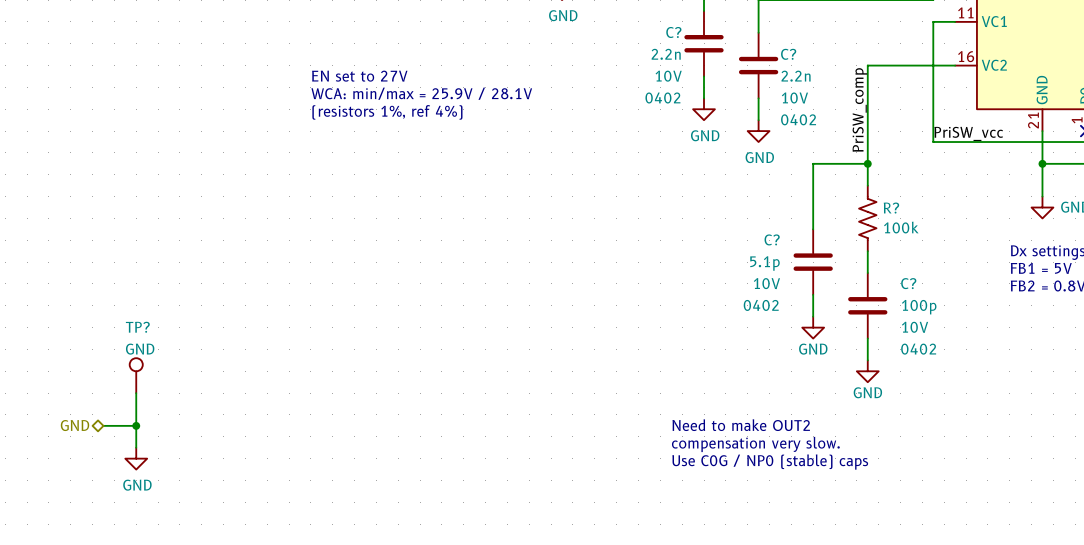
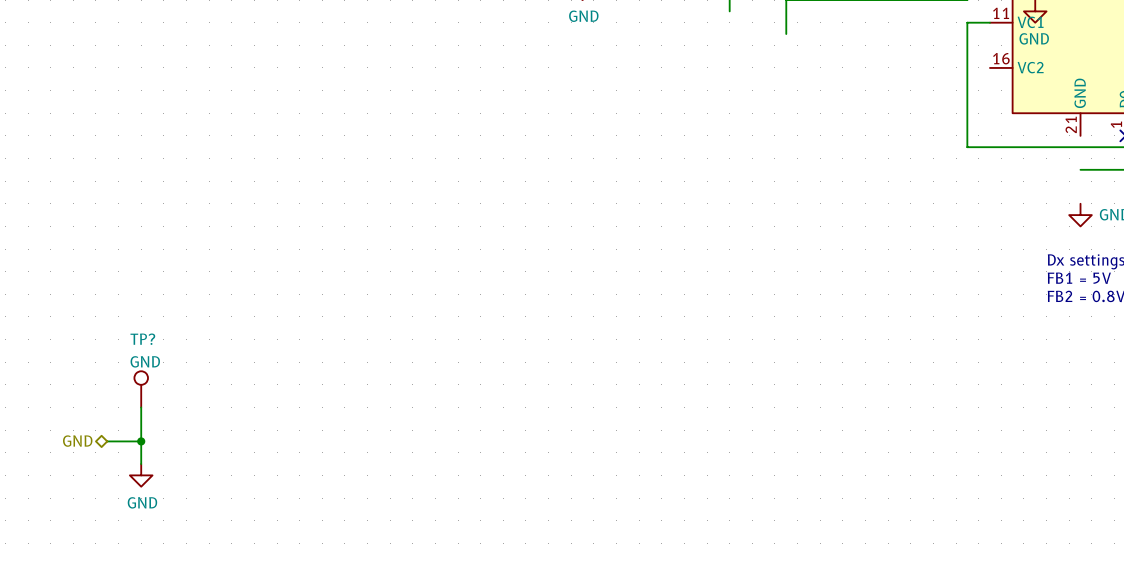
power symbol: none -> GND (1035, 11)
C?: 2.2n (704, 43) -> none
C?: 2.2n (758, 65) -> none
wire: (955, 65) (867, 65) (867, 185) -> none
text: EN set to 27V (359, 76) -> none
wire: (704, 76) (704, 98) -> none
text: WCA: min/max = 25.9V / 28.1V (421, 93) -> none
wire: (758, 98) (758, 120) -> none
power symbol: GND (704, 109) -> none
label: PriSW_comp (859, 109) -> none
text: (resistors 1%, ref 4%) (387, 112) -> none
power symbol: GND (758, 131) -> none
wire: (1042, 131) (1042, 196) -> none
label: PriSW_vcc (968, 133) -> none
wire: (867, 163) (813, 163) (813, 229) -> none
junction: (867, 163) -> none
junction: (1042, 163) -> none
R?: 100k (867, 218) -> none
wire: (867, 251) (867, 273) -> none
C?: 5.1p (813, 262) -> none
wire: (813, 294) (813, 316) -> none
C?: 100p (867, 305) -> none
power symbol: GND (813, 327) -> none
wire: (867, 338) (867, 360) -> none
power symbol: GND (867, 371) -> none
text: Need to make OUT2 (741, 425) -> none
text: compensation very slow. (755, 444) -> none
text: Use C0G / NP0 (stable) caps (770, 462) -> none

